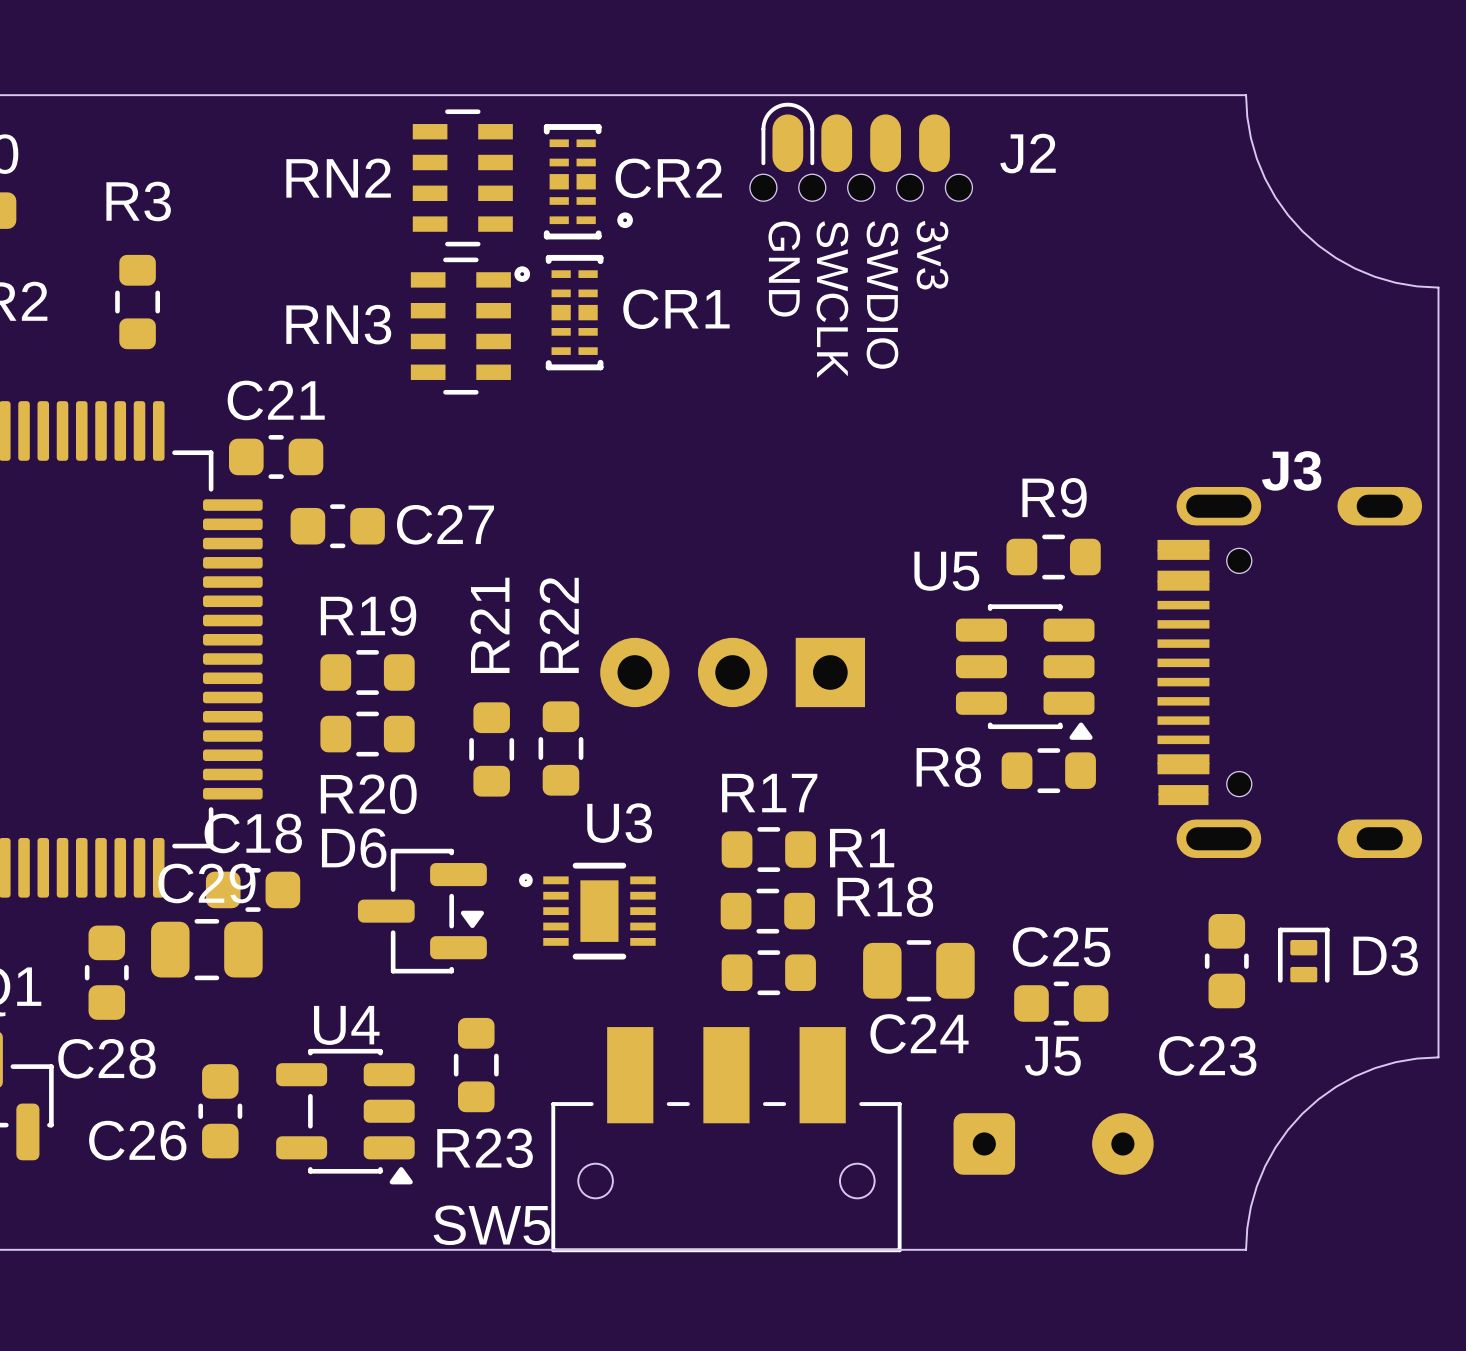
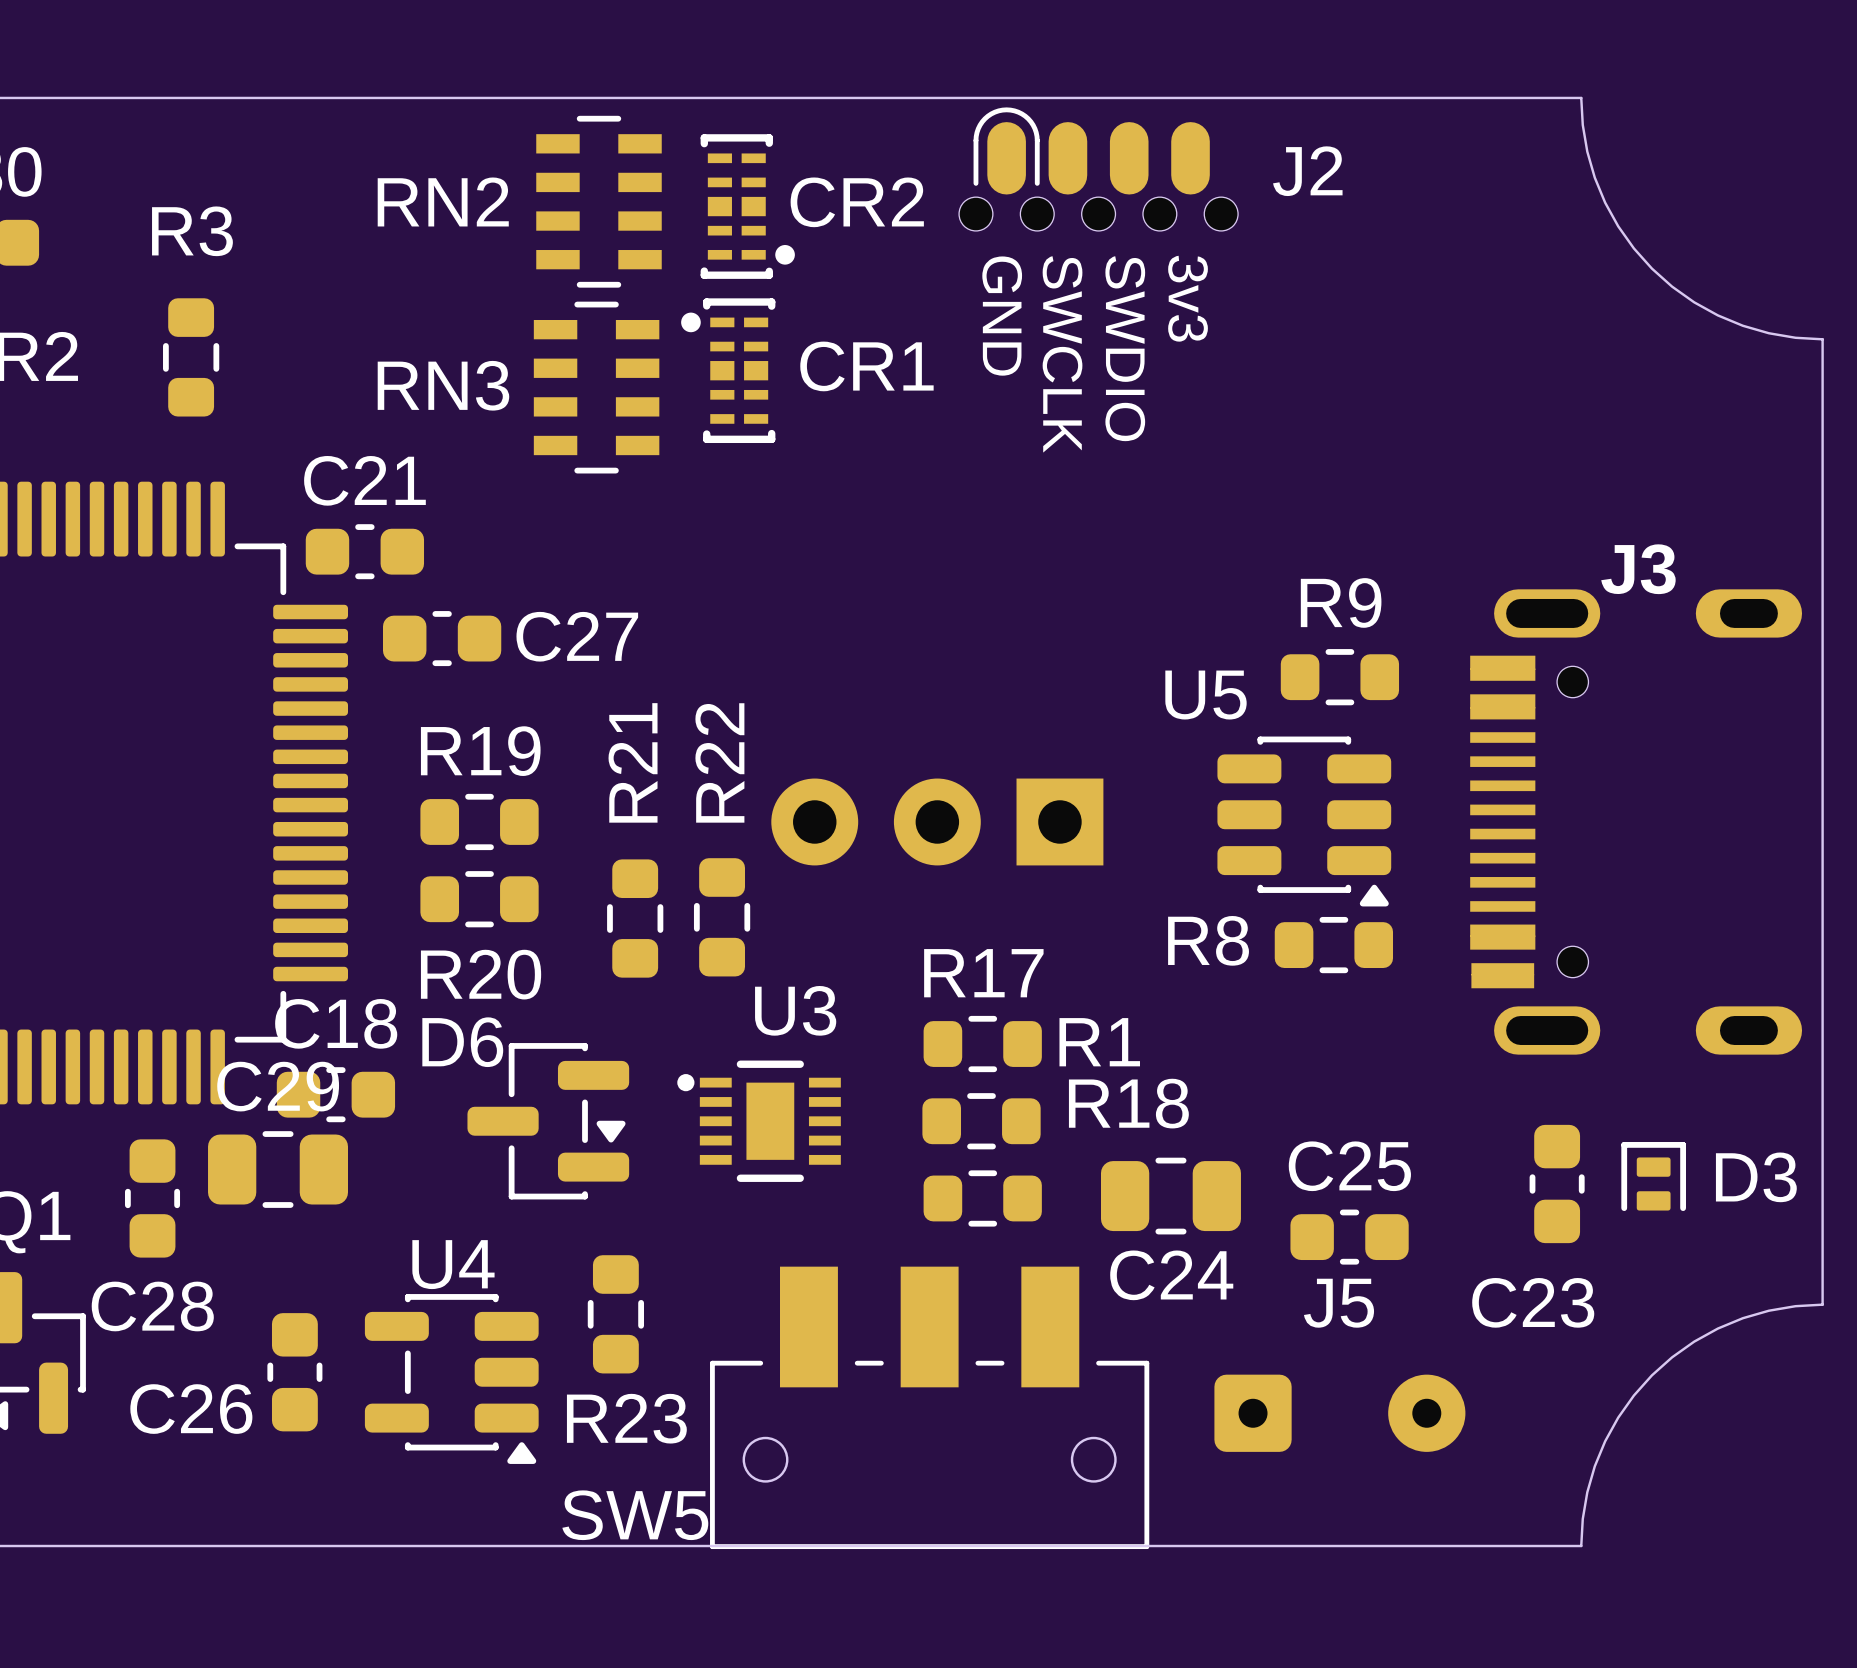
CR2 footprint: [543, 124, 633, 240] -> [700, 134, 795, 279]
CR1 footprint: [514, 254, 604, 371] -> [681, 298, 776, 444]
U3 footprint: [519, 862, 656, 960] -> [677, 1060, 841, 1182]

